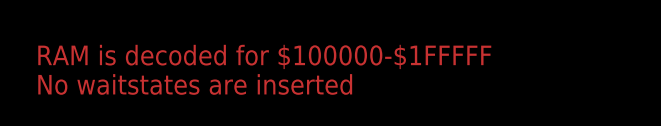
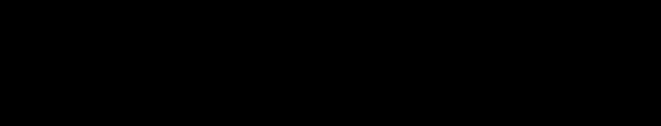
text: RAM is decoded for $100000-$1FFFFF (264, 56) -> none
text: No waitstates are inserted (195, 84) -> none

